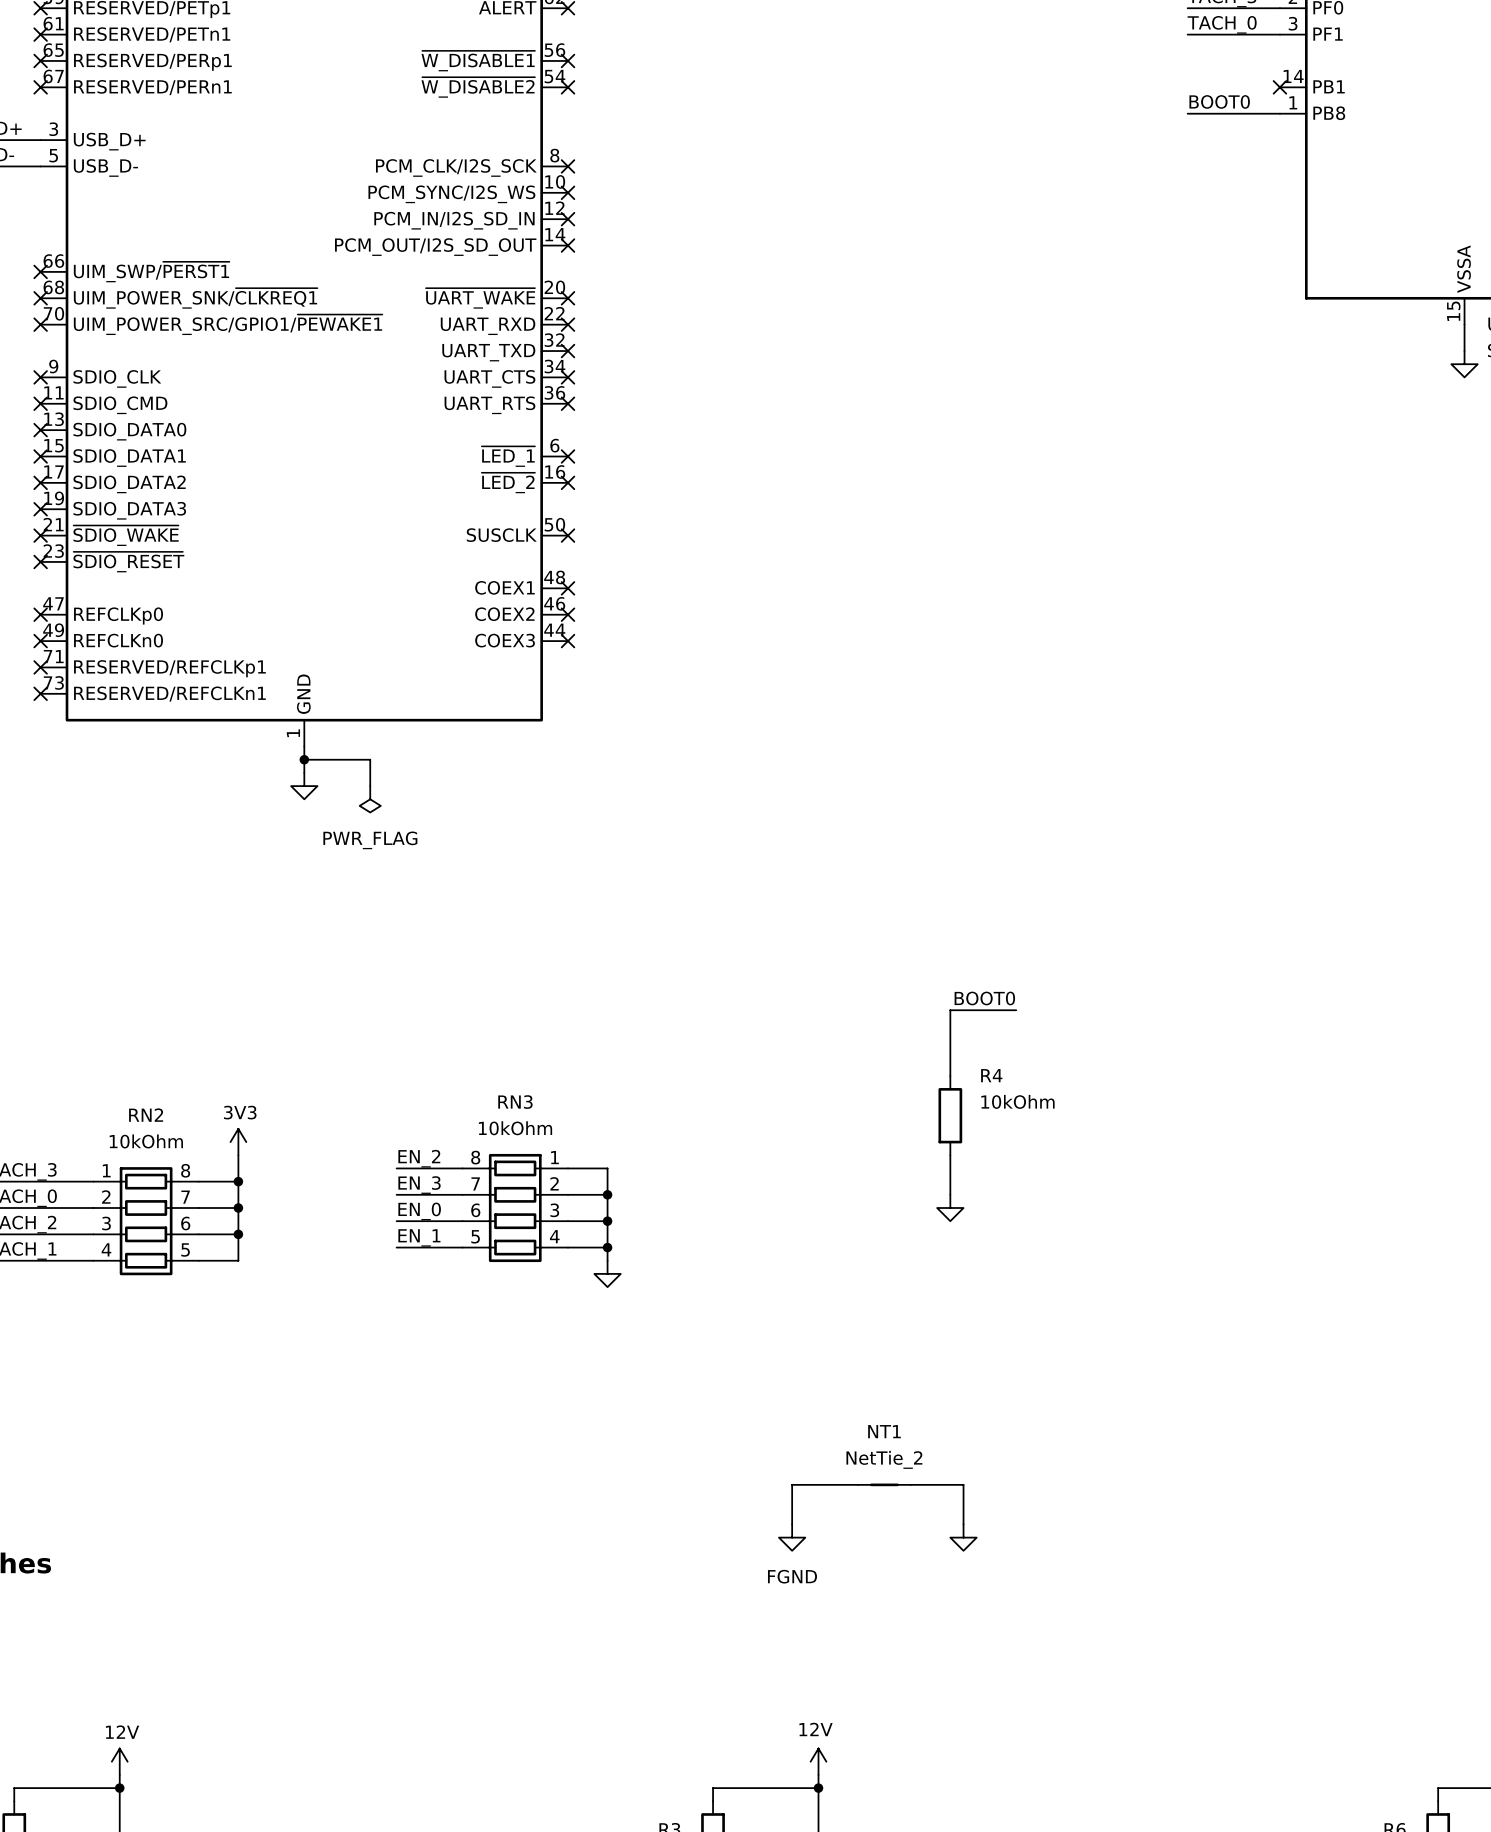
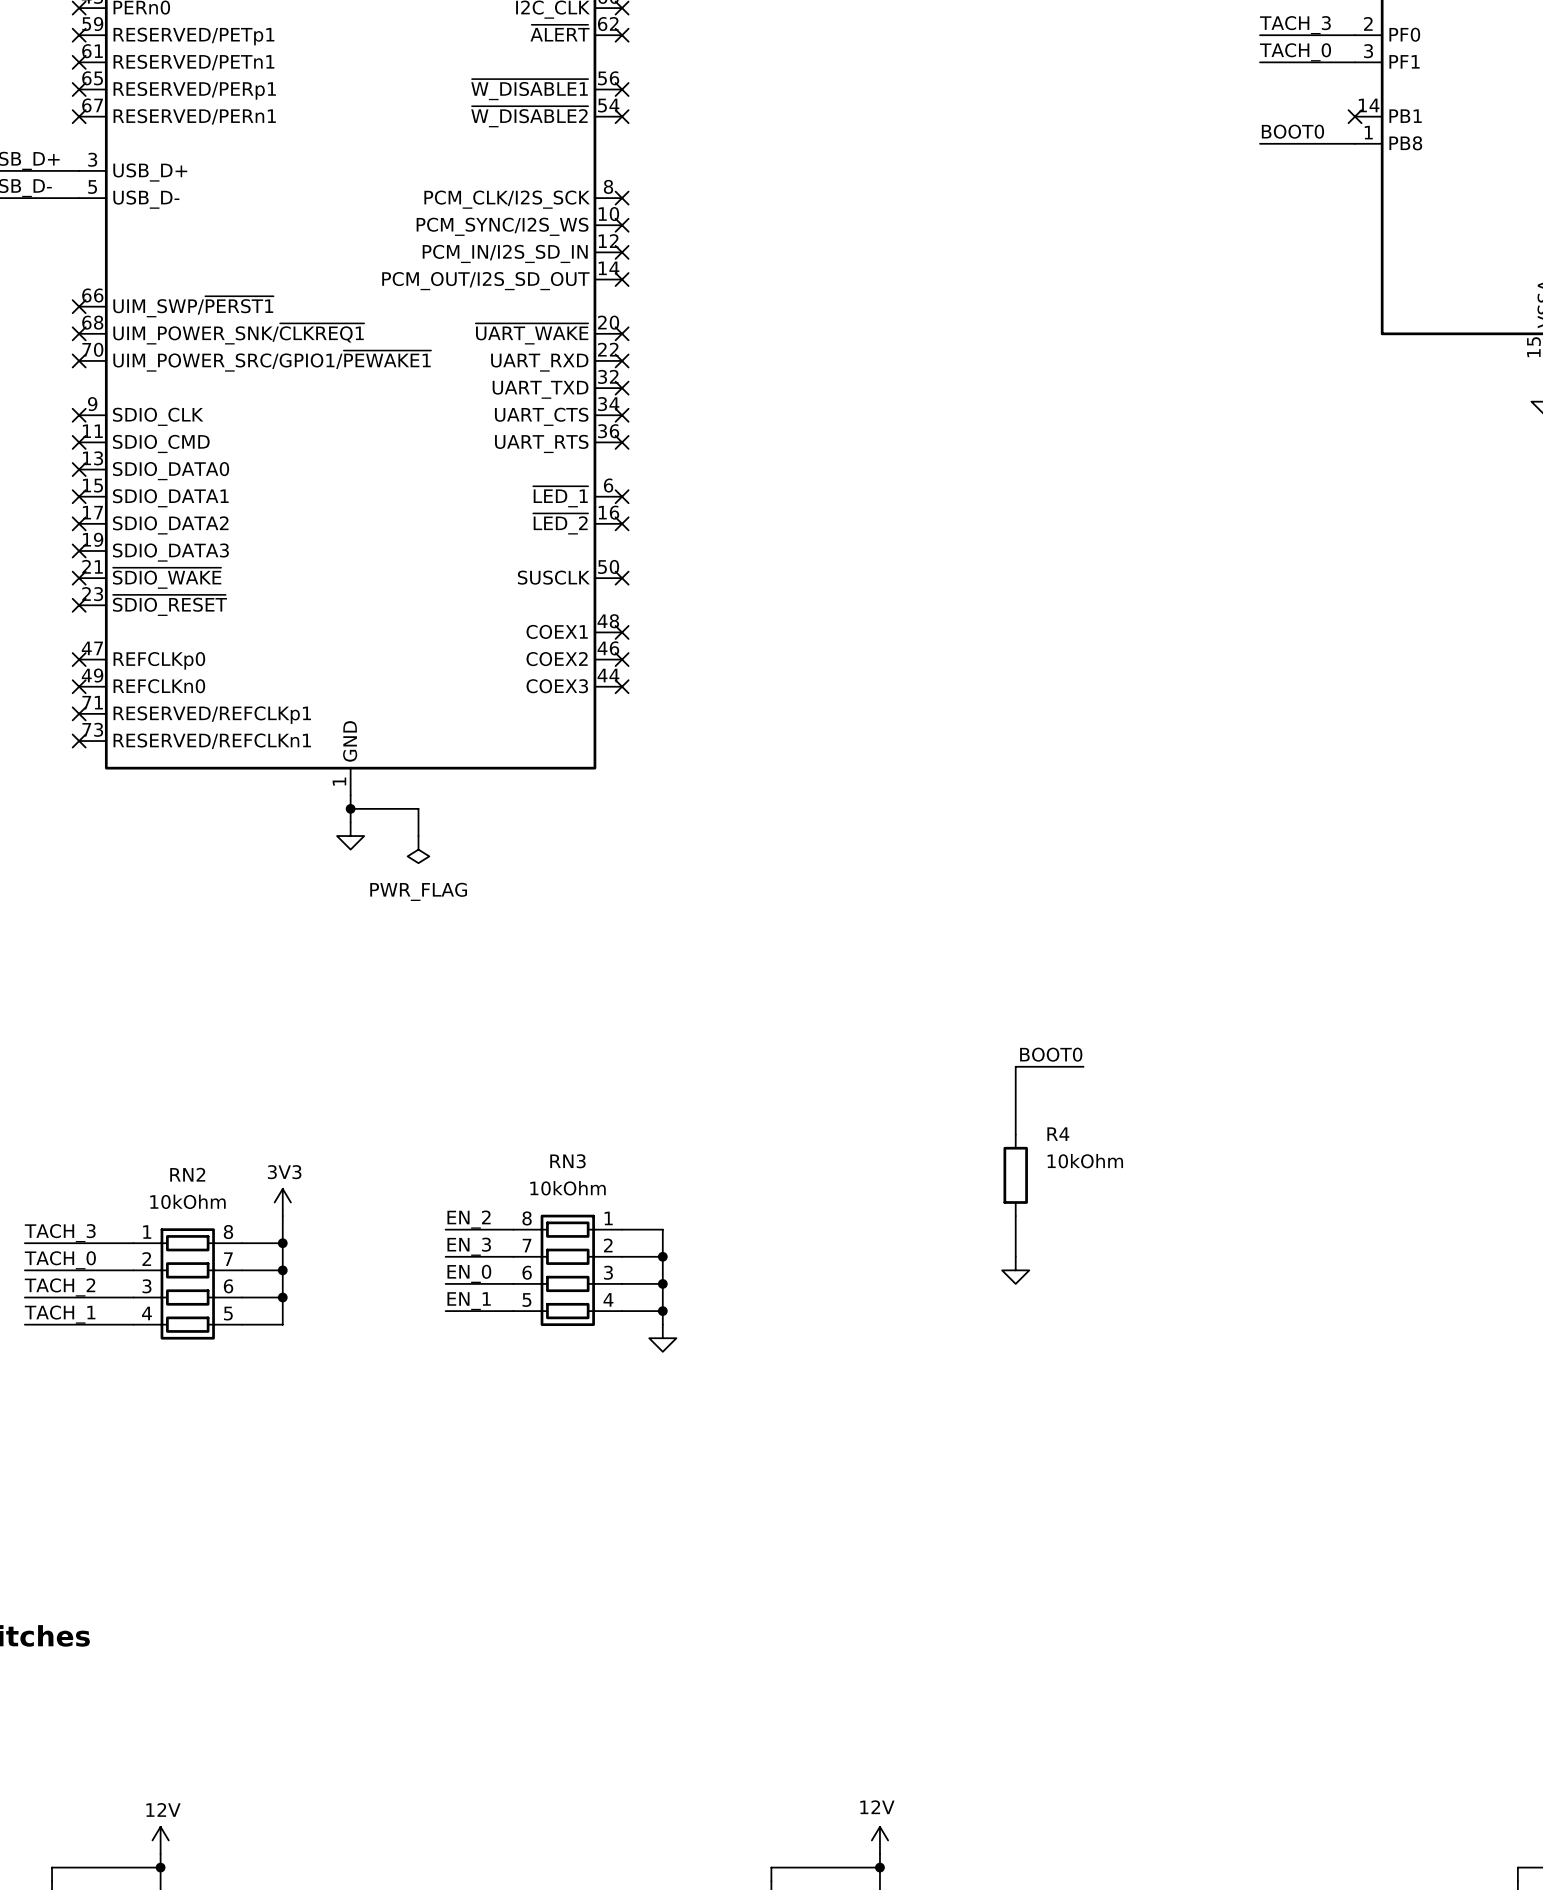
wire: (858, 1484) (792, 1484) (792, 1524) -> none
NT1: NetTie_2 (884, 1484) -> none
wire: (910, 1484) (963, 1484) (963, 1524) -> none
power symbol: FGND (792, 1537) -> none
power symbol: (963, 1537) -> none

